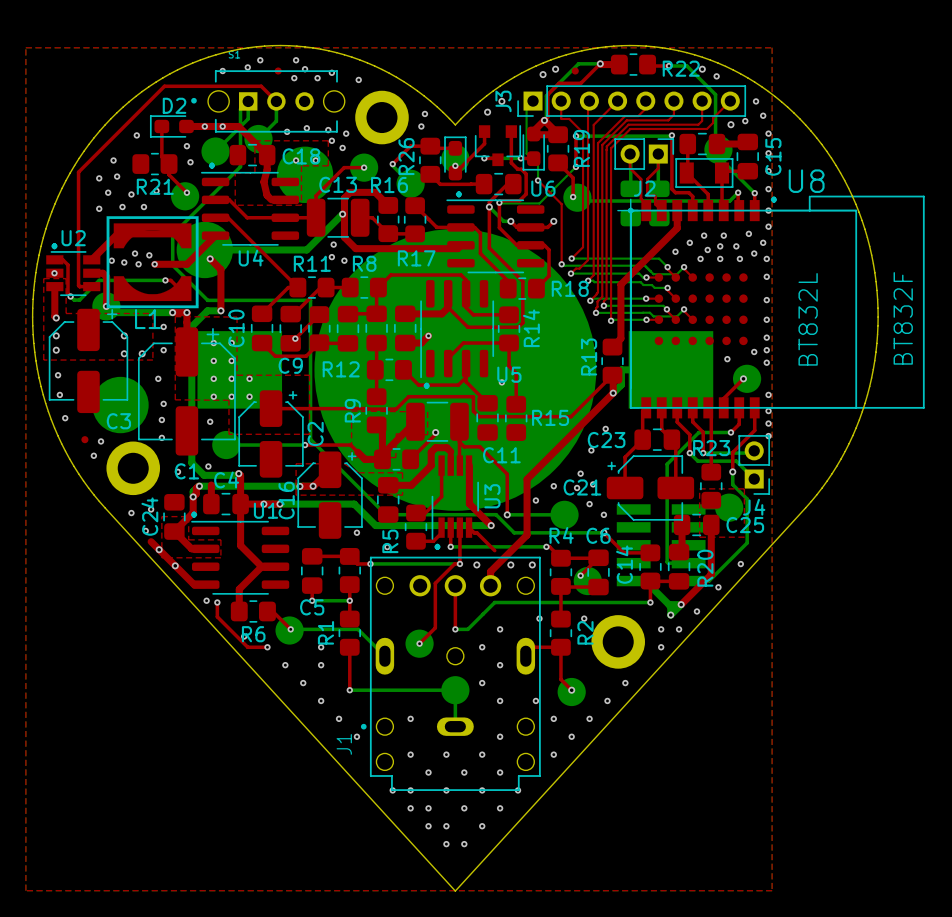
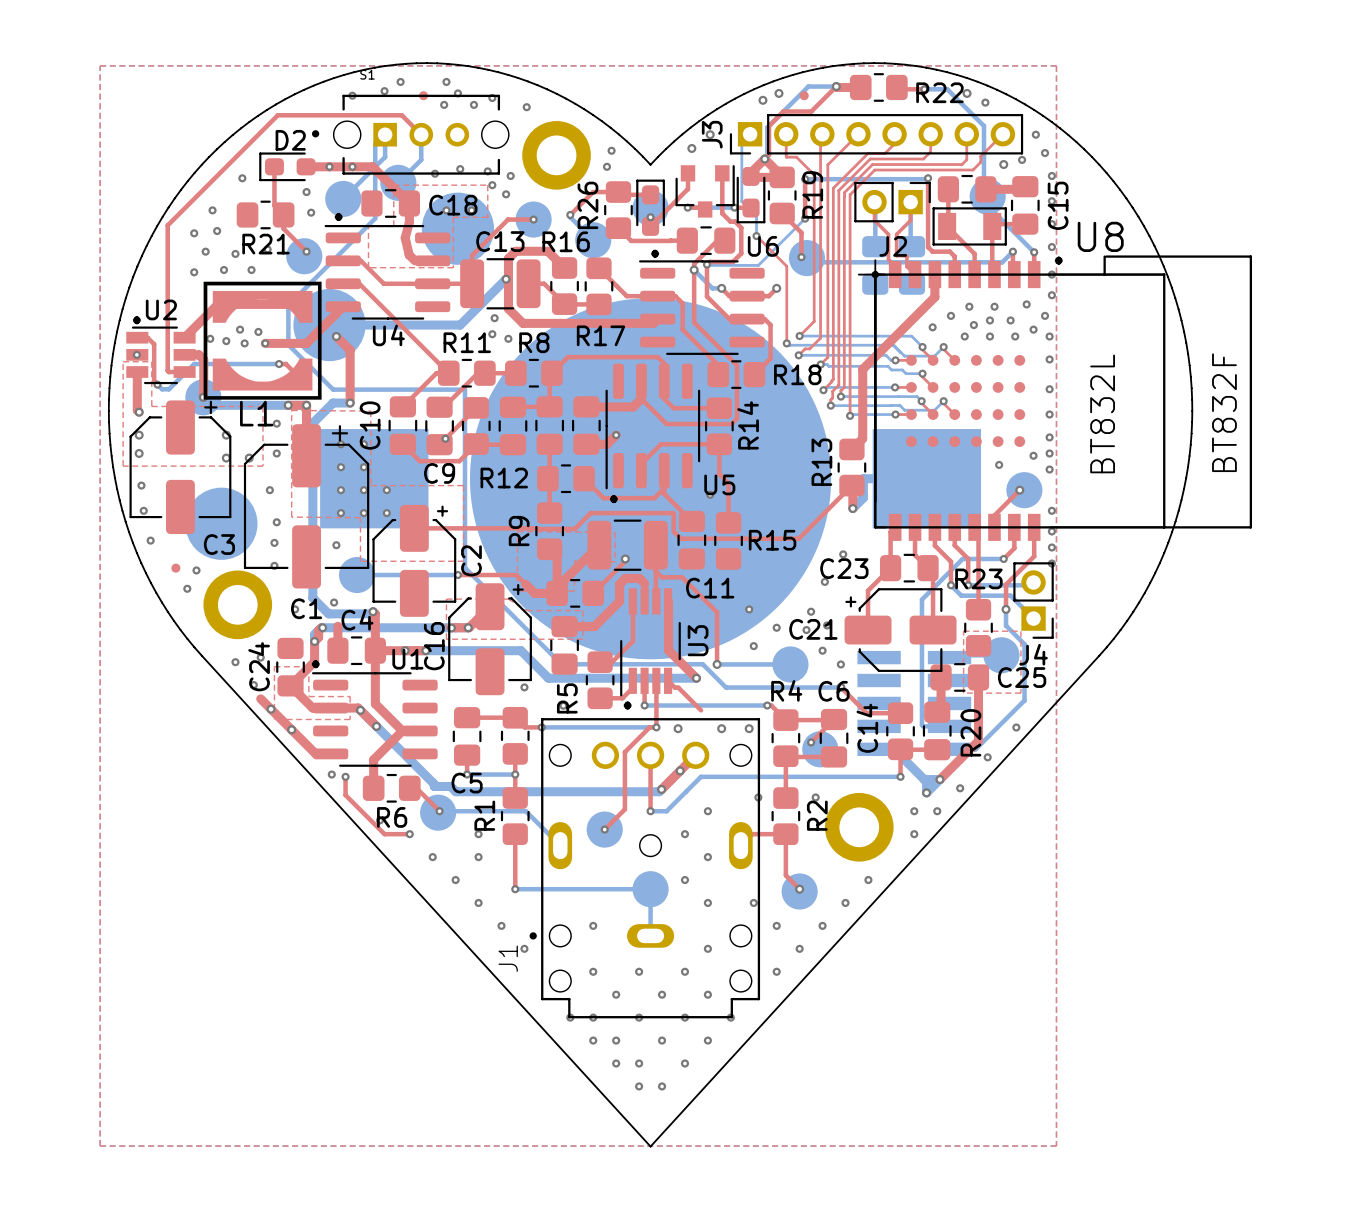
top track: (613, 393) (527, 479) (527, 535) (490, 571) (490, 585) -> (661, 789) (695, 755)
via: none -> (749, 609)
top track: none -> (330, 708) (358, 708) (376, 726)
bottom track: none -> (360, 710) (434, 784) (434, 786) (450, 786) (455, 791) (659, 791) (680, 770)
via: none -> (360, 710)
via: none -> (376, 726)
via: none -> (680, 770)
via: none -> (661, 789)

